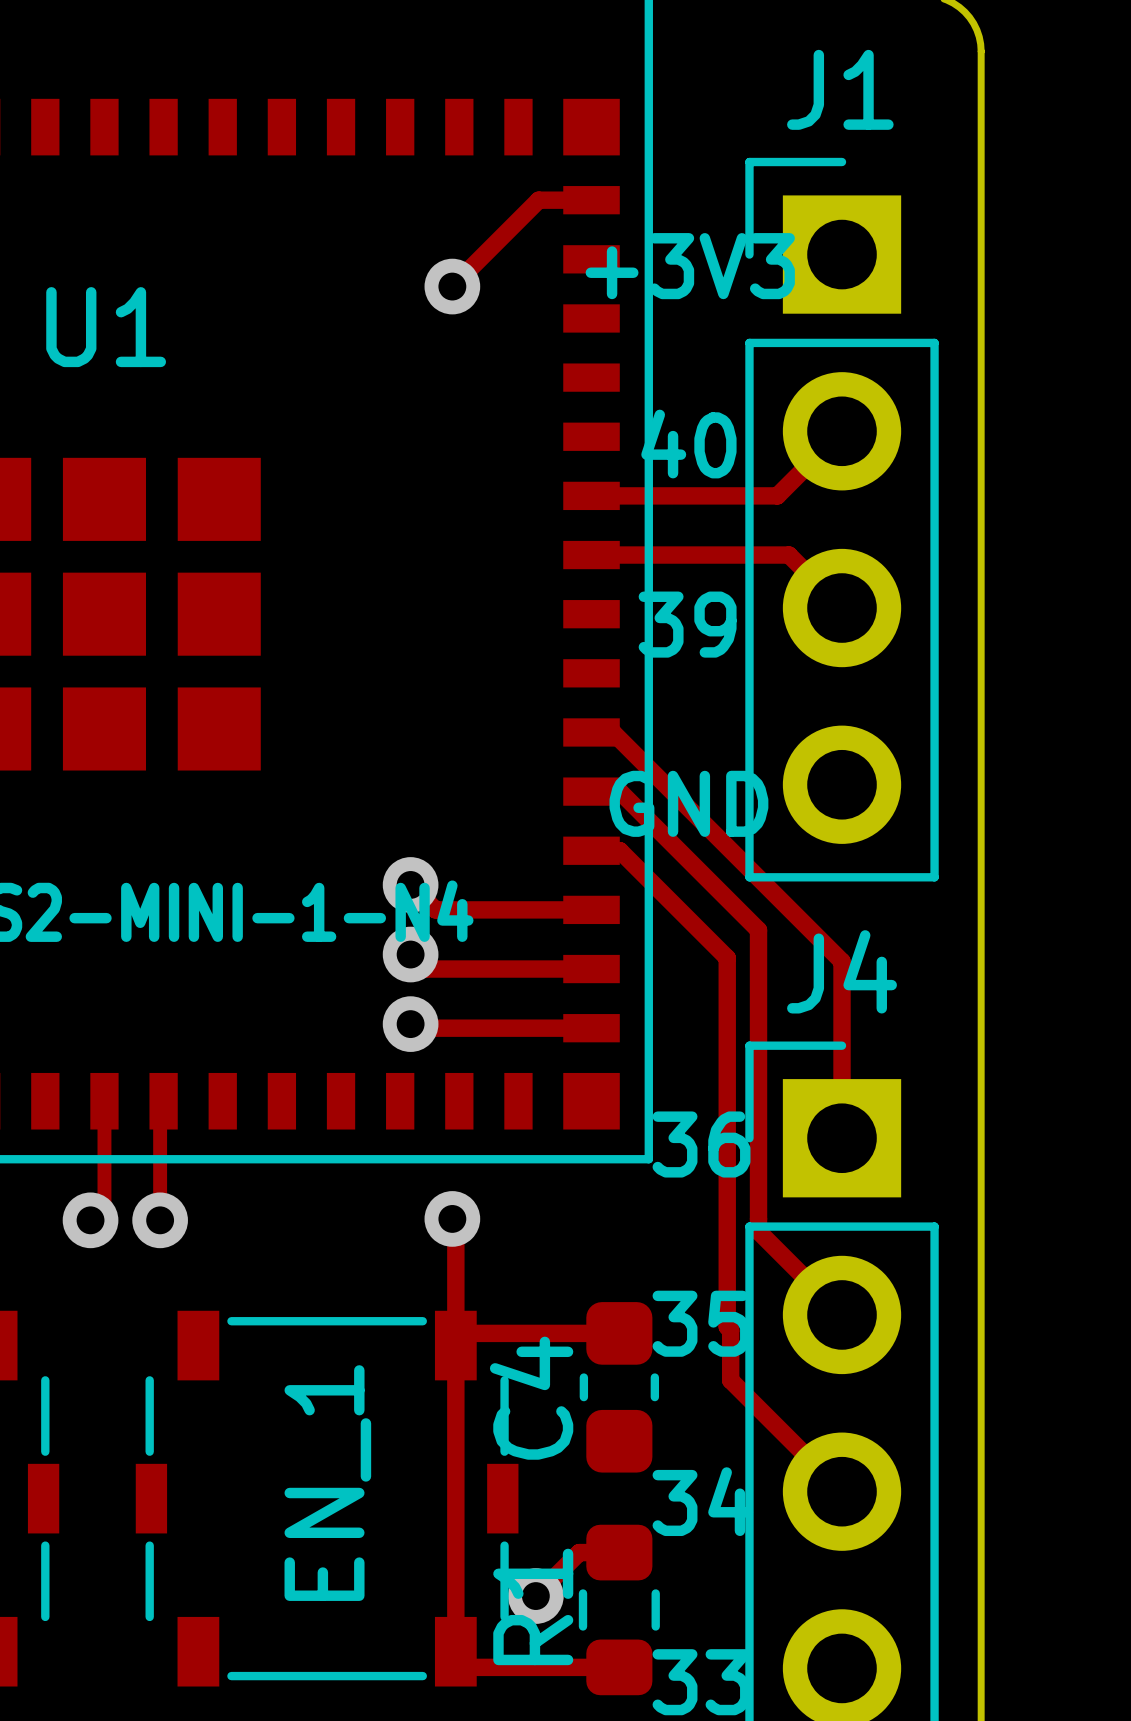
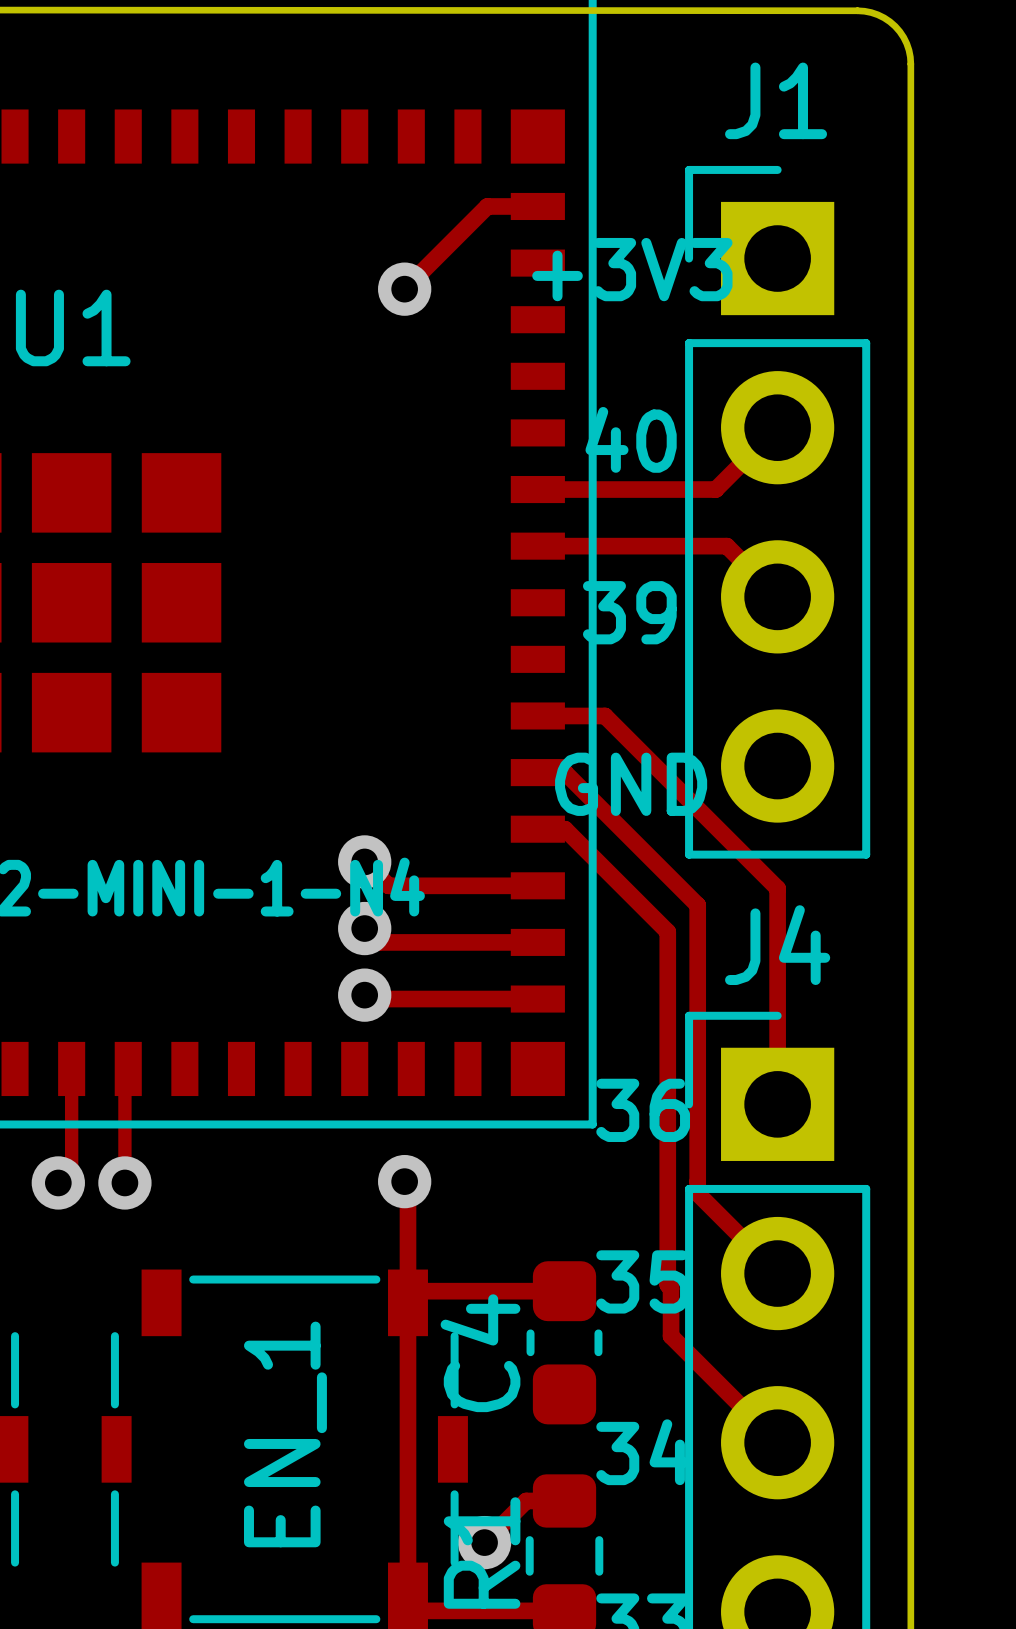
track: (612, 732) (842, 961) -> (558, 715) (605, 715) (777, 888) (777, 935)

